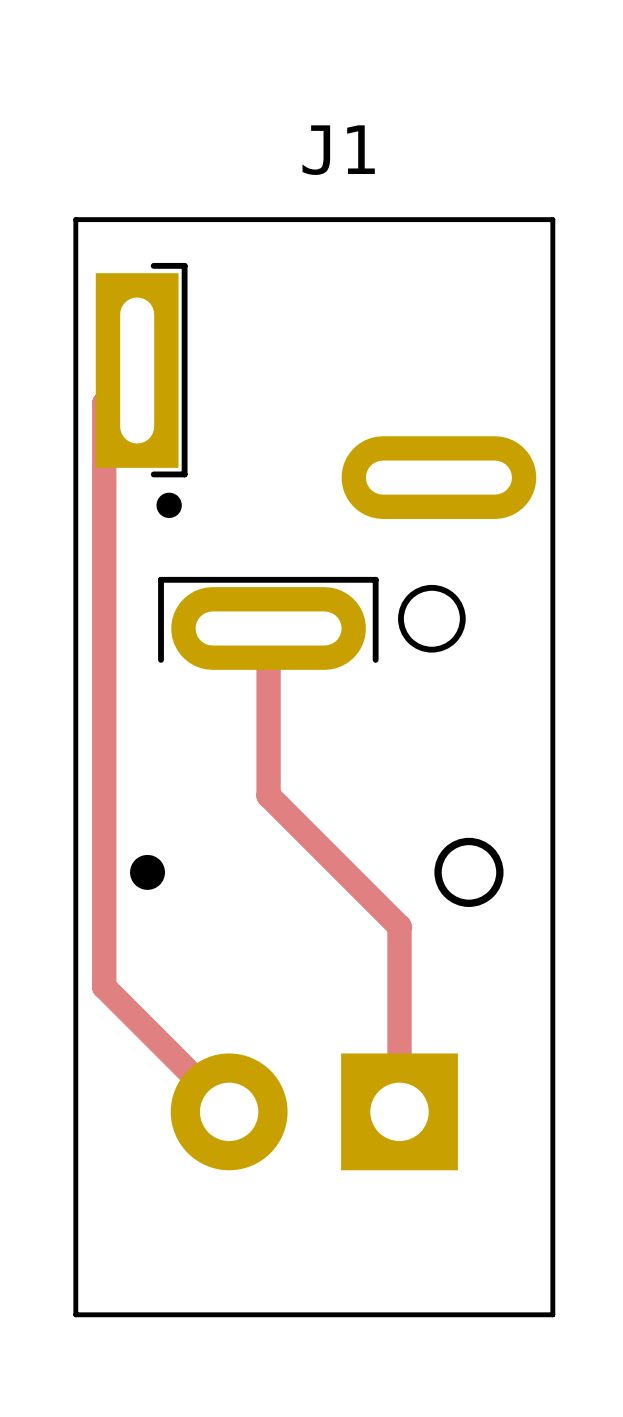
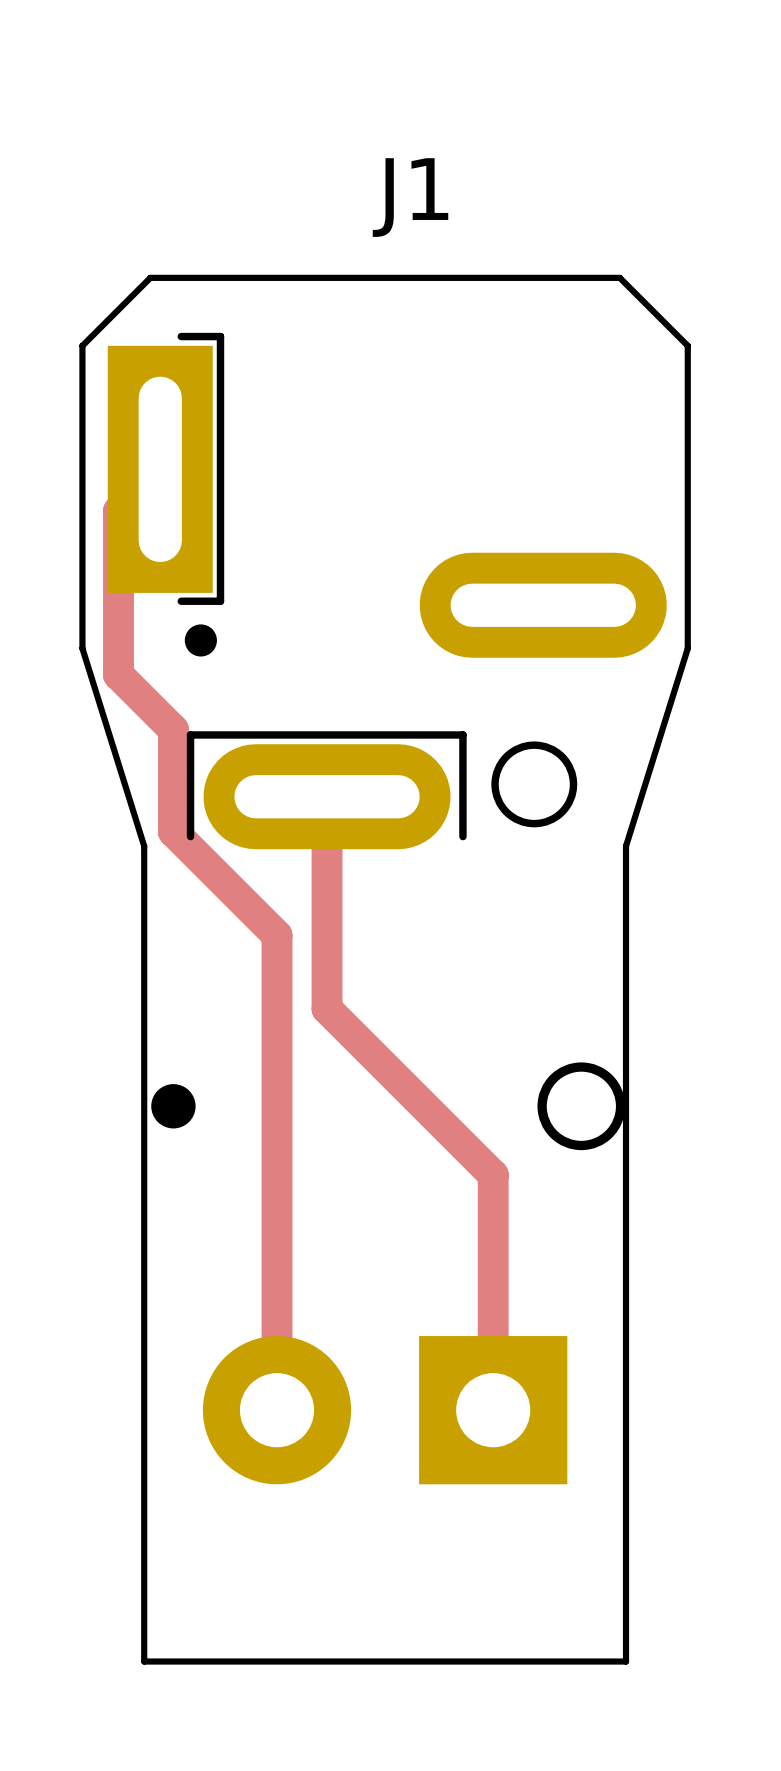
board edge: (129, 219) (75, 219) (75, 273) -> (150, 277) (82, 345)
board edge: (499, 219) (552, 219) (552, 273) -> (619, 277) (687, 345)
board edge: (75, 511) (75, 1314) (552, 1314) (552, 511) -> (82, 648) (144, 846) (144, 1661) (626, 1661) (626, 846) (687, 648)
track: (104, 532) (104, 986) (229, 1111) -> (118, 674) (173, 729) (173, 831) (277, 935) (277, 1410)

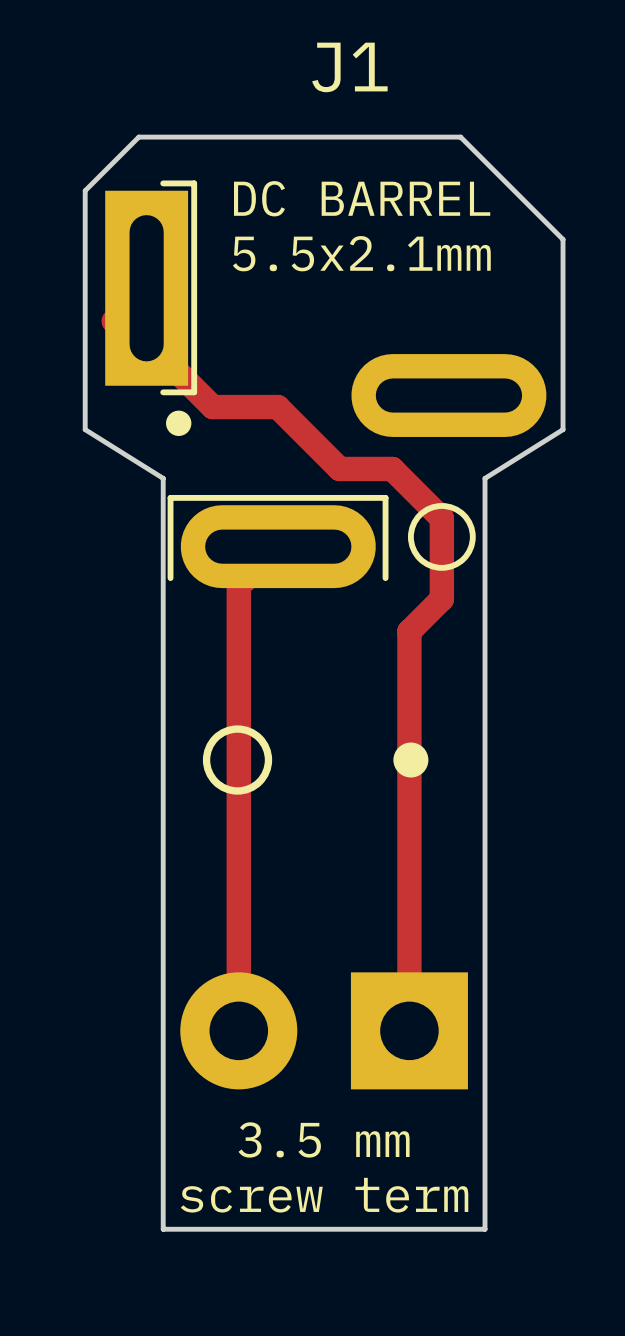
board edge: (558, 277) (619, 277) (687, 345) (687, 407) -> (460, 137) (563, 239)
text: none -> DC BARREL (362, 198)
text: none -> 5.5x2.1mm (361, 253)
track: none -> (146, 288) (146, 340) (212, 407) (277, 407) (339, 468) (392, 468) (441, 518) (441, 599) (409, 631) (409, 845)
track: (118, 511) (118, 674) (173, 729) (173, 831) (277, 935) -> none
board edge: (82, 648) (144, 846) (144, 1661) (181, 1661) -> (85, 429) (163, 478) (163, 1229)
board edge: (687, 648) (626, 846) (626, 1661) (588, 1661) -> (563, 429) (485, 478) (485, 1229)
track: (327, 796) (327, 1008) (493, 1175) -> (278, 546) (238, 586) (238, 656)
drawing: none -> [202, 725, 273, 795]
drawing: [537, 1062, 626, 1151] -> none
drawing position: (173, 1106) -> (410, 760)
text: none -> 3.5 mm (324, 1139)
text: none -> screw term (324, 1195)

